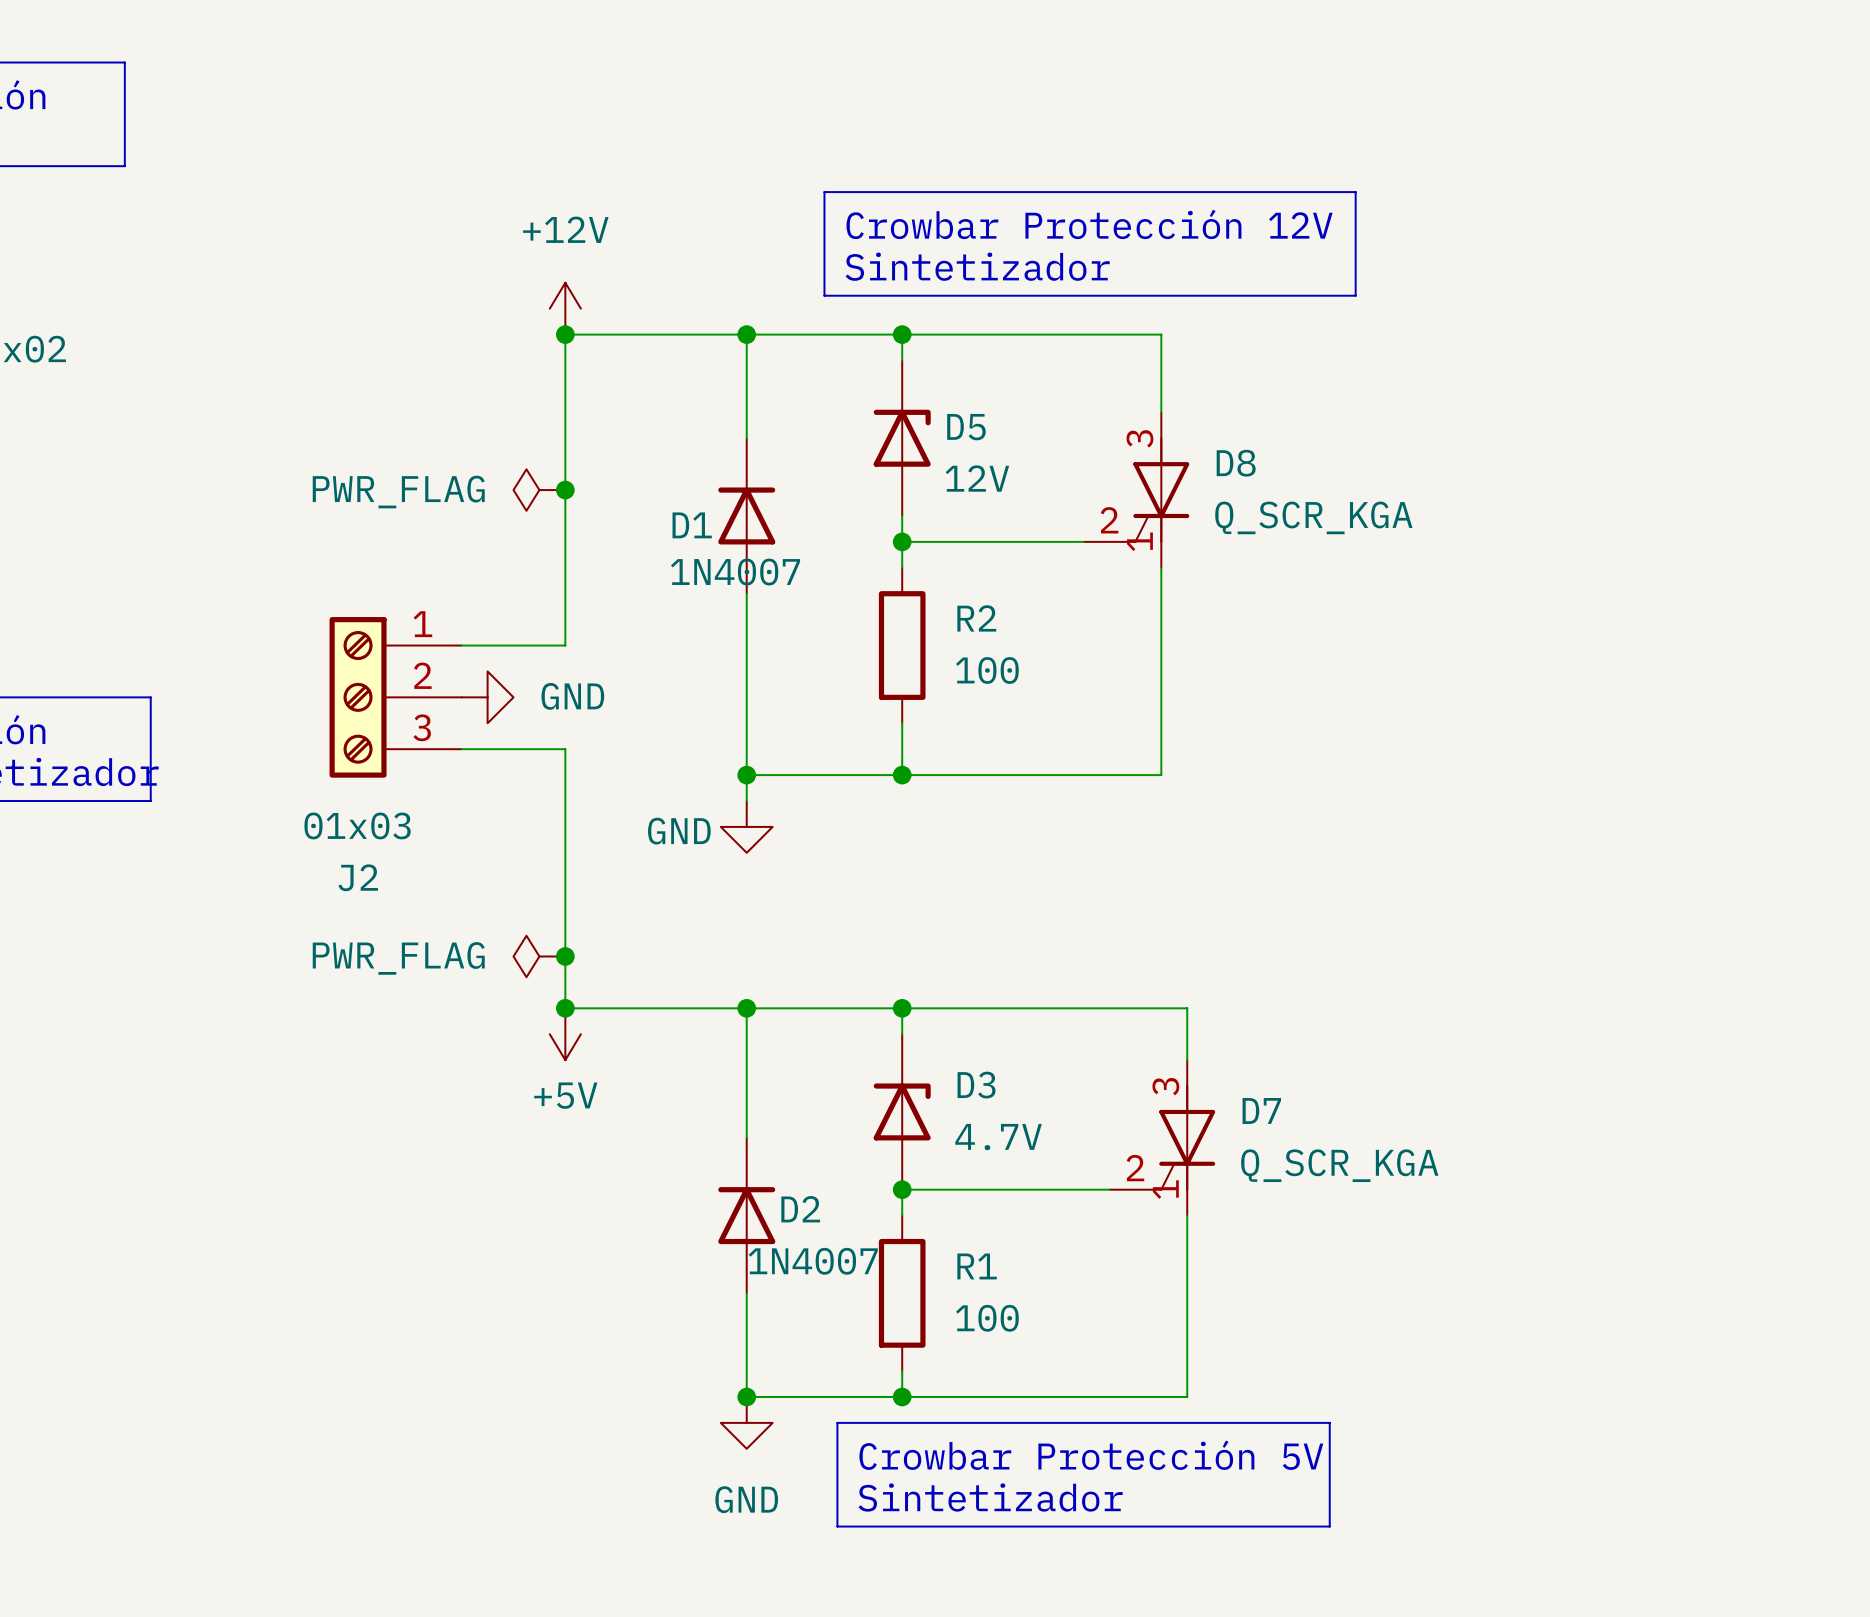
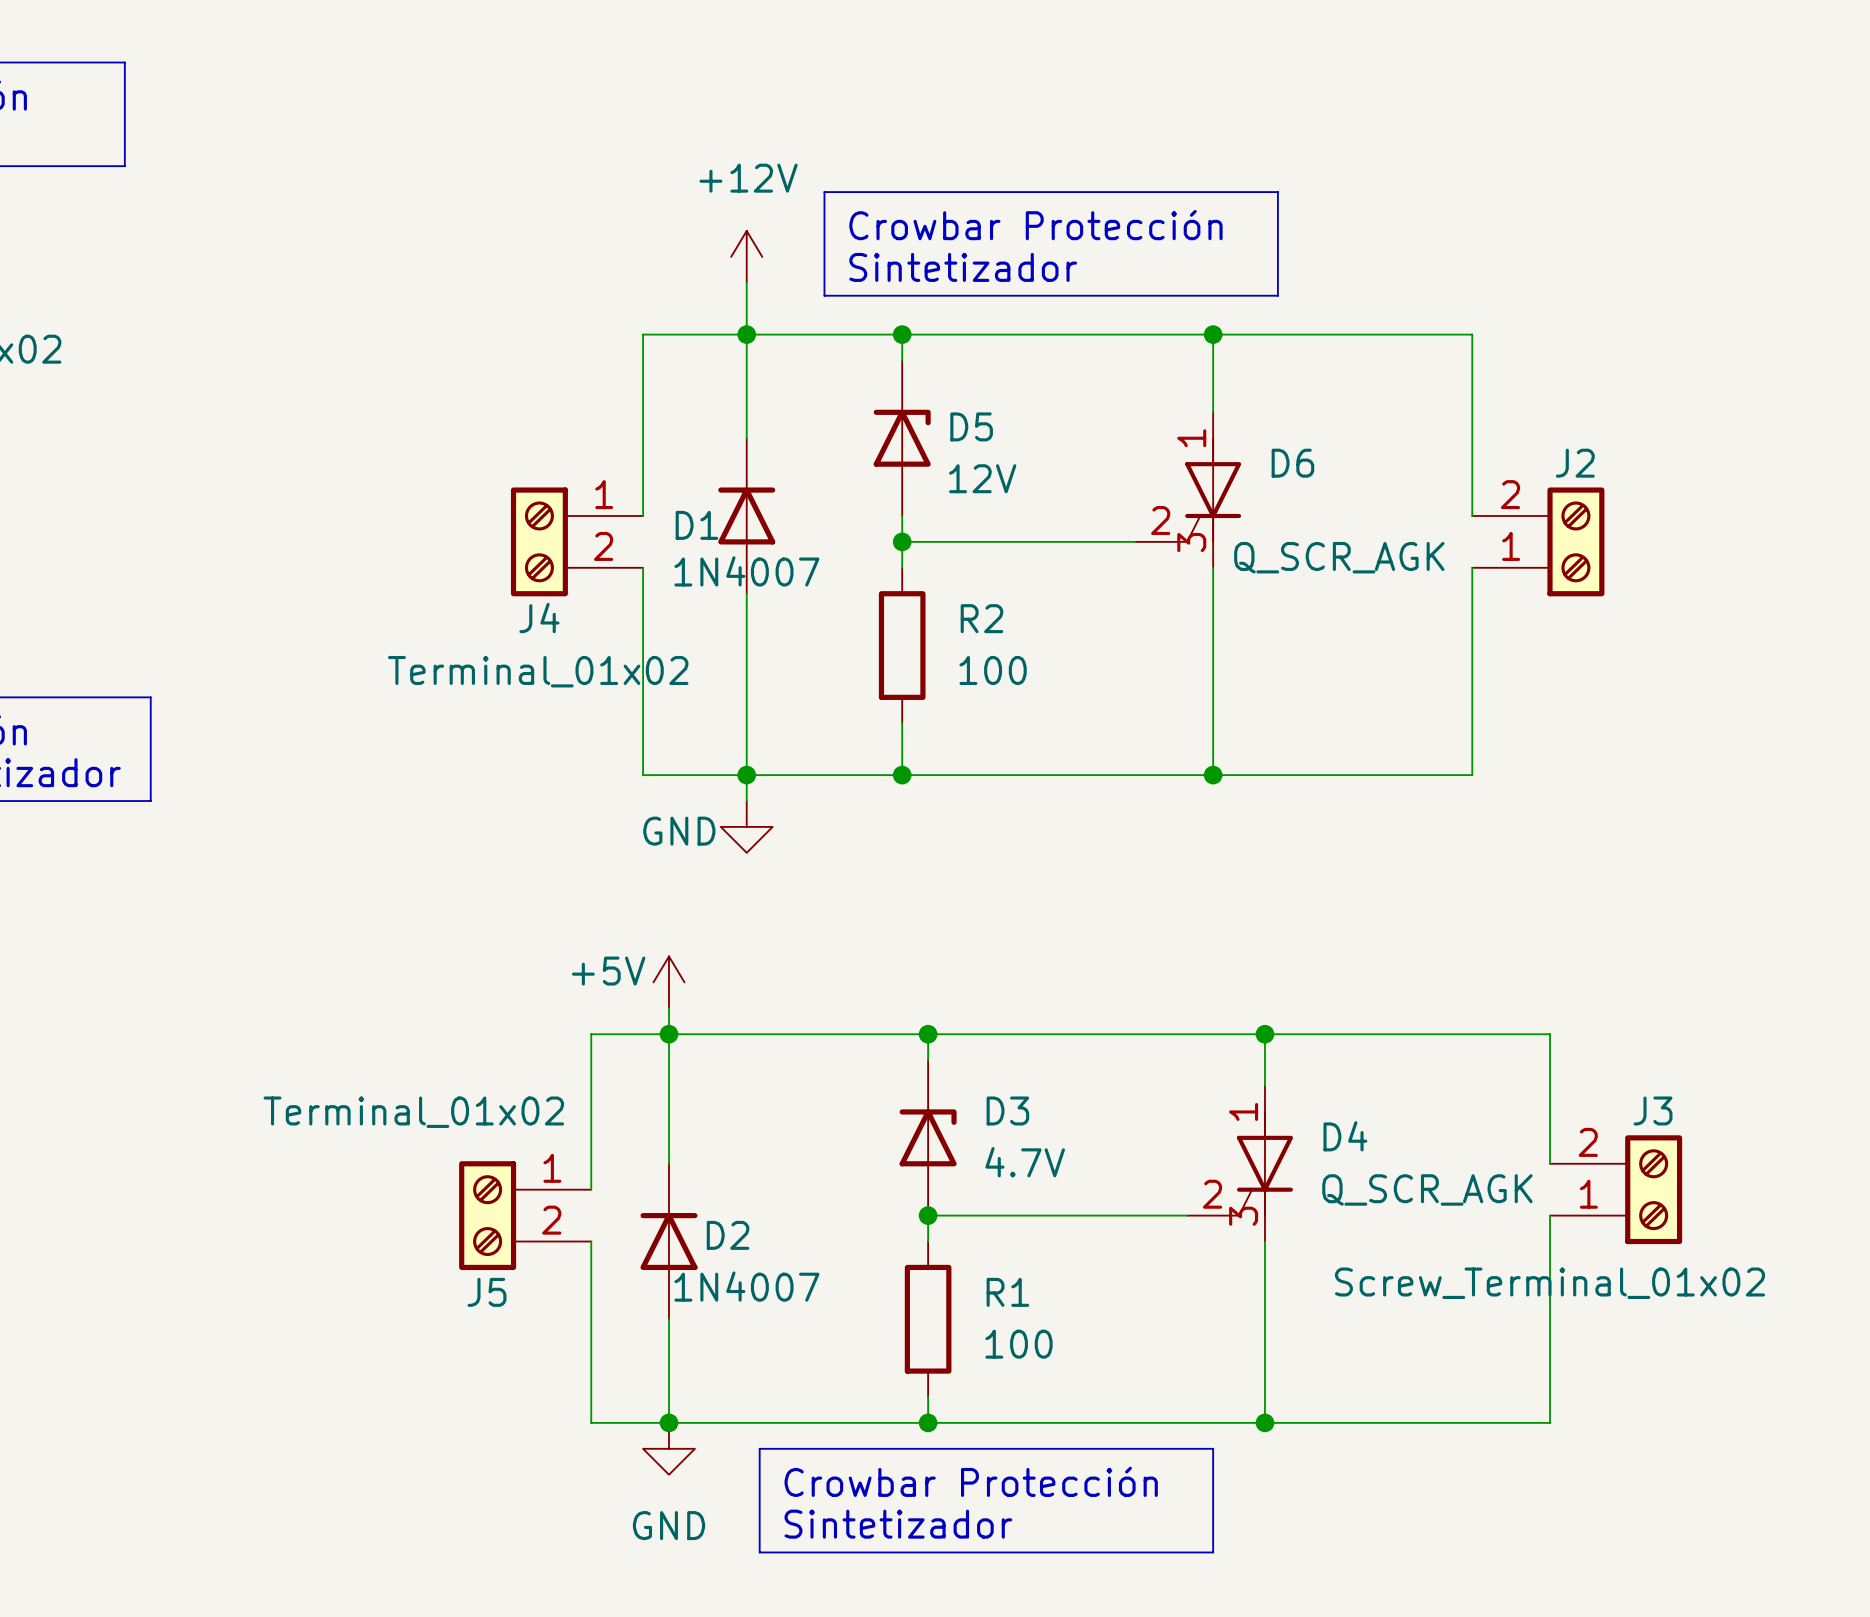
line: (1277, 192) (1355, 192) (1355, 295) (1277, 295) -> (1277, 192) (1277, 295)
text: Crowbar Protección 12V (1089, 224) -> Crowbar Protección (1035, 225)
wire: none -> (746, 282) (746, 334)
power symbol position: +12V (565, 308) -> +12V (746, 256)
junction: (565, 334) -> none
wire: (643, 334) (565, 334) (565, 645) (461, 645) -> (643, 334) (643, 515)
wire: (1161, 334) (1161, 412) -> (1161, 334) (1472, 334) (1472, 515)
wire: none -> (1213, 334) (1213, 412)
junction: none -> (1213, 334)
power symbol: PWR_FLAG (539, 490) -> none
junction: (565, 490) -> none
D8: Q_SCR_KGA (1136, 490) -> none
D6: none -> Q_SCR_AGK (1188, 490)
J4: none -> Terminal_01x02 (577, 541)
wire: none -> (643, 567) (643, 775) (746, 775)
wire: (1161, 567) (1161, 775) -> (1472, 567) (1472, 775) (1161, 775)
wire: none -> (1213, 567) (1213, 775)
J2 symbol: [329, 617, 462, 778] -> [1472, 487, 1605, 597]
power symbol: GND (487, 697) -> none
wire: (461, 749) (565, 749) (565, 1008) (1187, 1008) (1187, 1060) -> none
junction: none -> (1213, 775)
J2 value: 01x03 (357, 825) -> none
J2 name position: J2 (358, 877) -> J2 (1575, 463)
power symbol: PWR_FLAG (539, 956) -> none
junction: (565, 956) -> none
junction: (565, 1008) -> none
wire: none -> (668, 1008) (668, 1163)
wire: (746, 1008) (746, 1137) -> none
junction: (746, 1008) -> none
wire: (902, 1008) (902, 1034) -> (928, 1034) (928, 1060)
junction position: (902, 1008) -> (928, 1034)
power symbol rotation: 0° (565, 1034) -> 180° (668, 982)
power symbol position: +5V (565, 1034) -> +5V (668, 982)
junction: none -> (668, 1034)
wire: none -> (1264, 1034) (1264, 1086)
junction: none -> (1264, 1034)
power symbol text position: +5V (565, 1095) -> +5V (608, 971)
D3 position: (902, 1111) -> (928, 1137)
D7: Q_SCR_KGA (1162, 1137) -> none
D4: none -> Q_SCR_AGK (1240, 1163)
wire: none -> (1550, 1163) (1550, 1034) (591, 1034) (591, 1189)
junction position: (902, 1189) -> (928, 1215)
wire: (1109, 1189) (902, 1189) (902, 1215) -> none
J3: none -> Screw_Terminal_01x02 (1616, 1189)
J5: none -> Terminal_01x02 (525, 1215)
D2 position: (746, 1215) -> (668, 1241)
wire: (1187, 1215) (1187, 1396) (746, 1396) (746, 1293) -> (1187, 1215) (928, 1215) (928, 1241)
wire: none -> (1550, 1215) (1550, 1422) (591, 1422) (591, 1241)
wire: none -> (1264, 1241) (1264, 1422)
R1 position: (902, 1293) -> (928, 1319)
wire: none -> (668, 1319) (668, 1422)
wire: (902, 1371) (902, 1396) -> (928, 1396) (928, 1422)
junction position: (746, 1396) -> (668, 1422)
junction position: (902, 1396) -> (928, 1422)
power symbol position: GND (746, 1422) -> GND (668, 1448)
line: (837, 1422) (1329, 1422) (1329, 1526) (837, 1526) (837, 1422) -> none
junction: none -> (1264, 1422)
line: none -> (759, 1448) (1213, 1448) (1213, 1552) (759, 1552) (759, 1448)
text: Crowbar Protección 5V (1091, 1455) -> Crowbar Protección (971, 1481)
text position: Sintetizador (990, 1497) -> Sintetizador (898, 1524)

